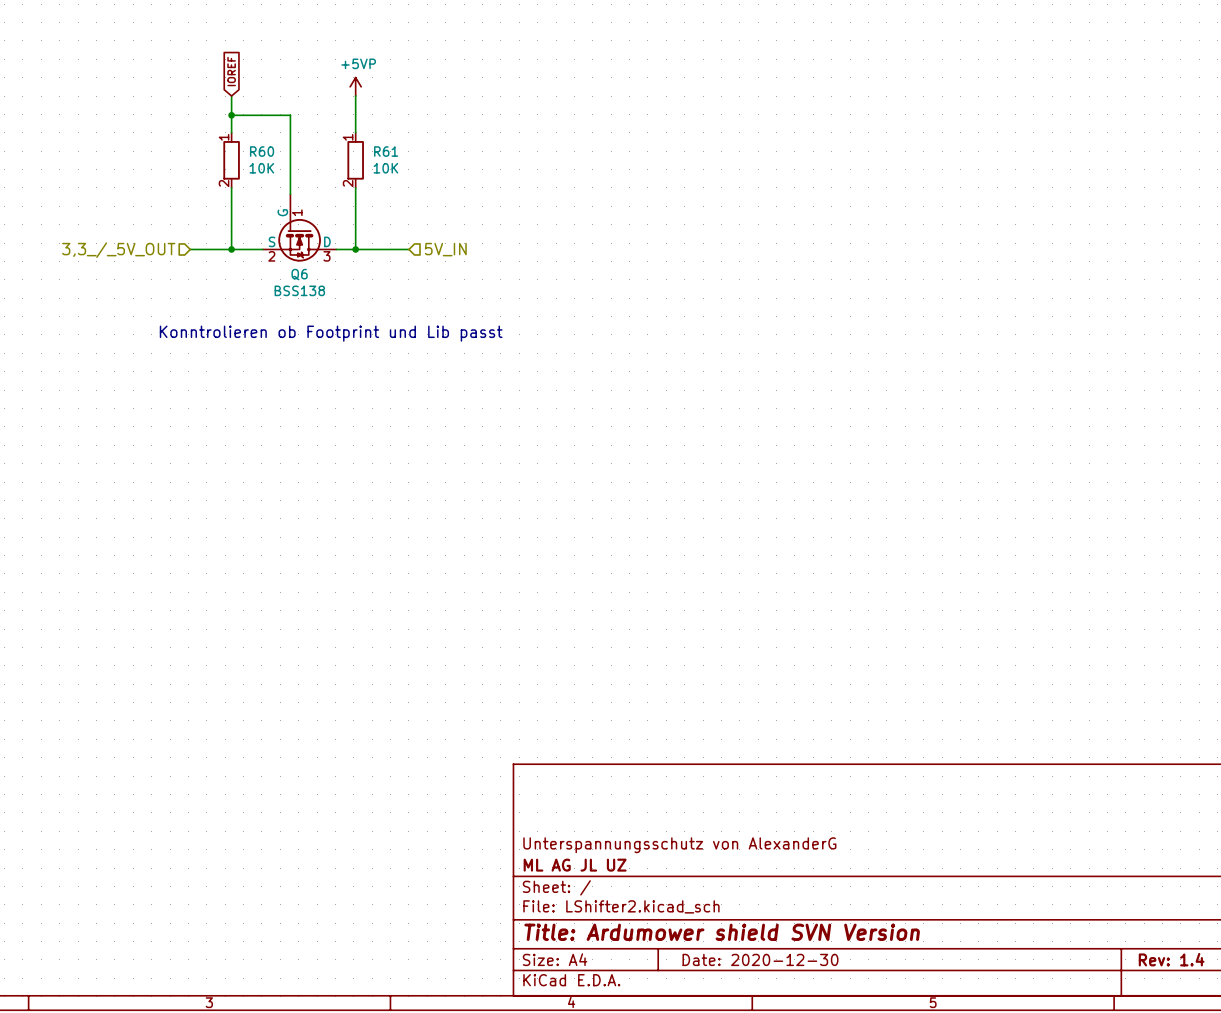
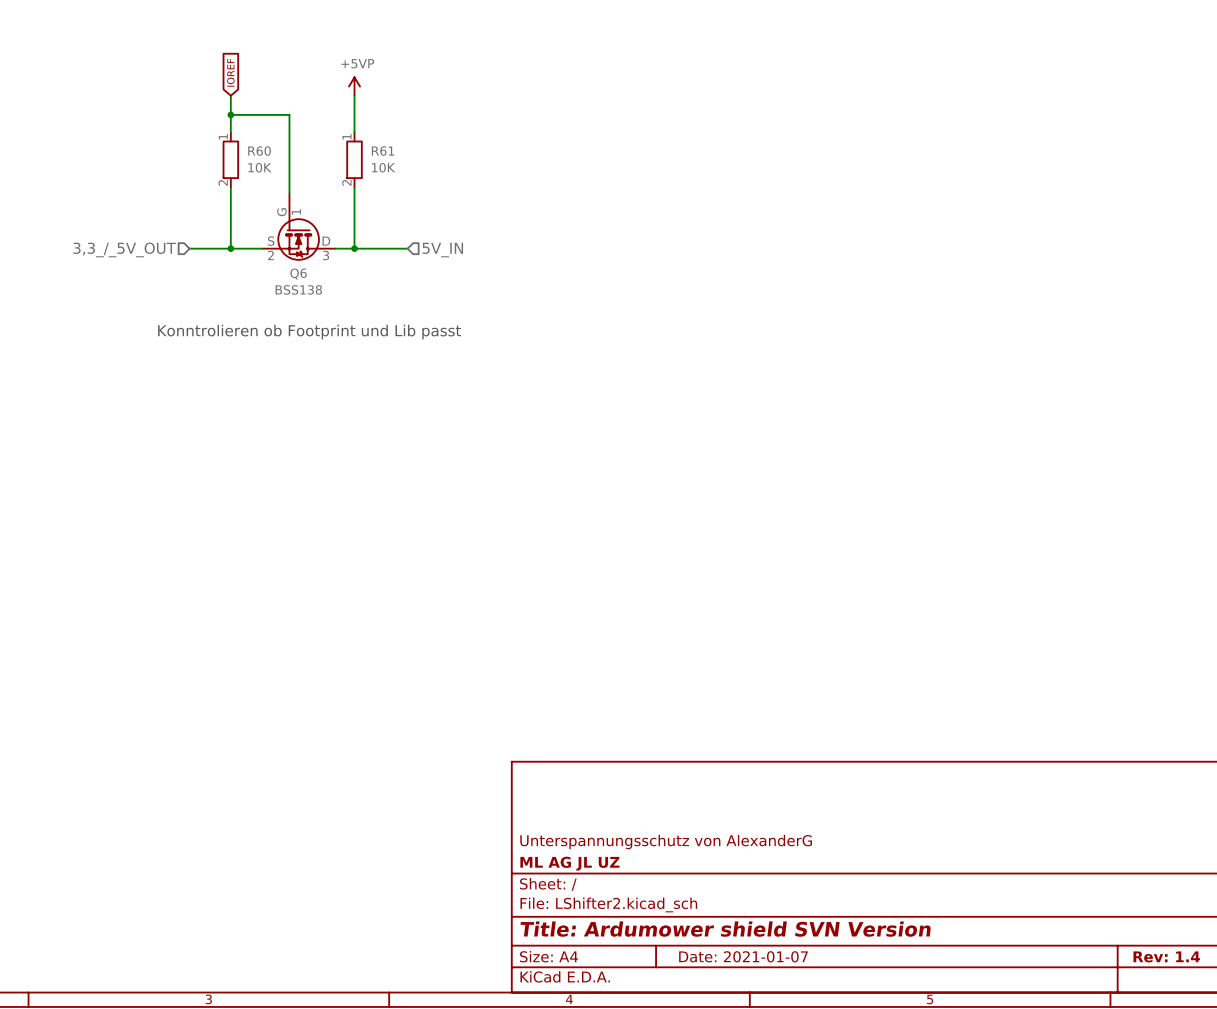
title block: Date: 2020-12-30 (760, 959) -> Date: 2021-01-07 (743, 956)

